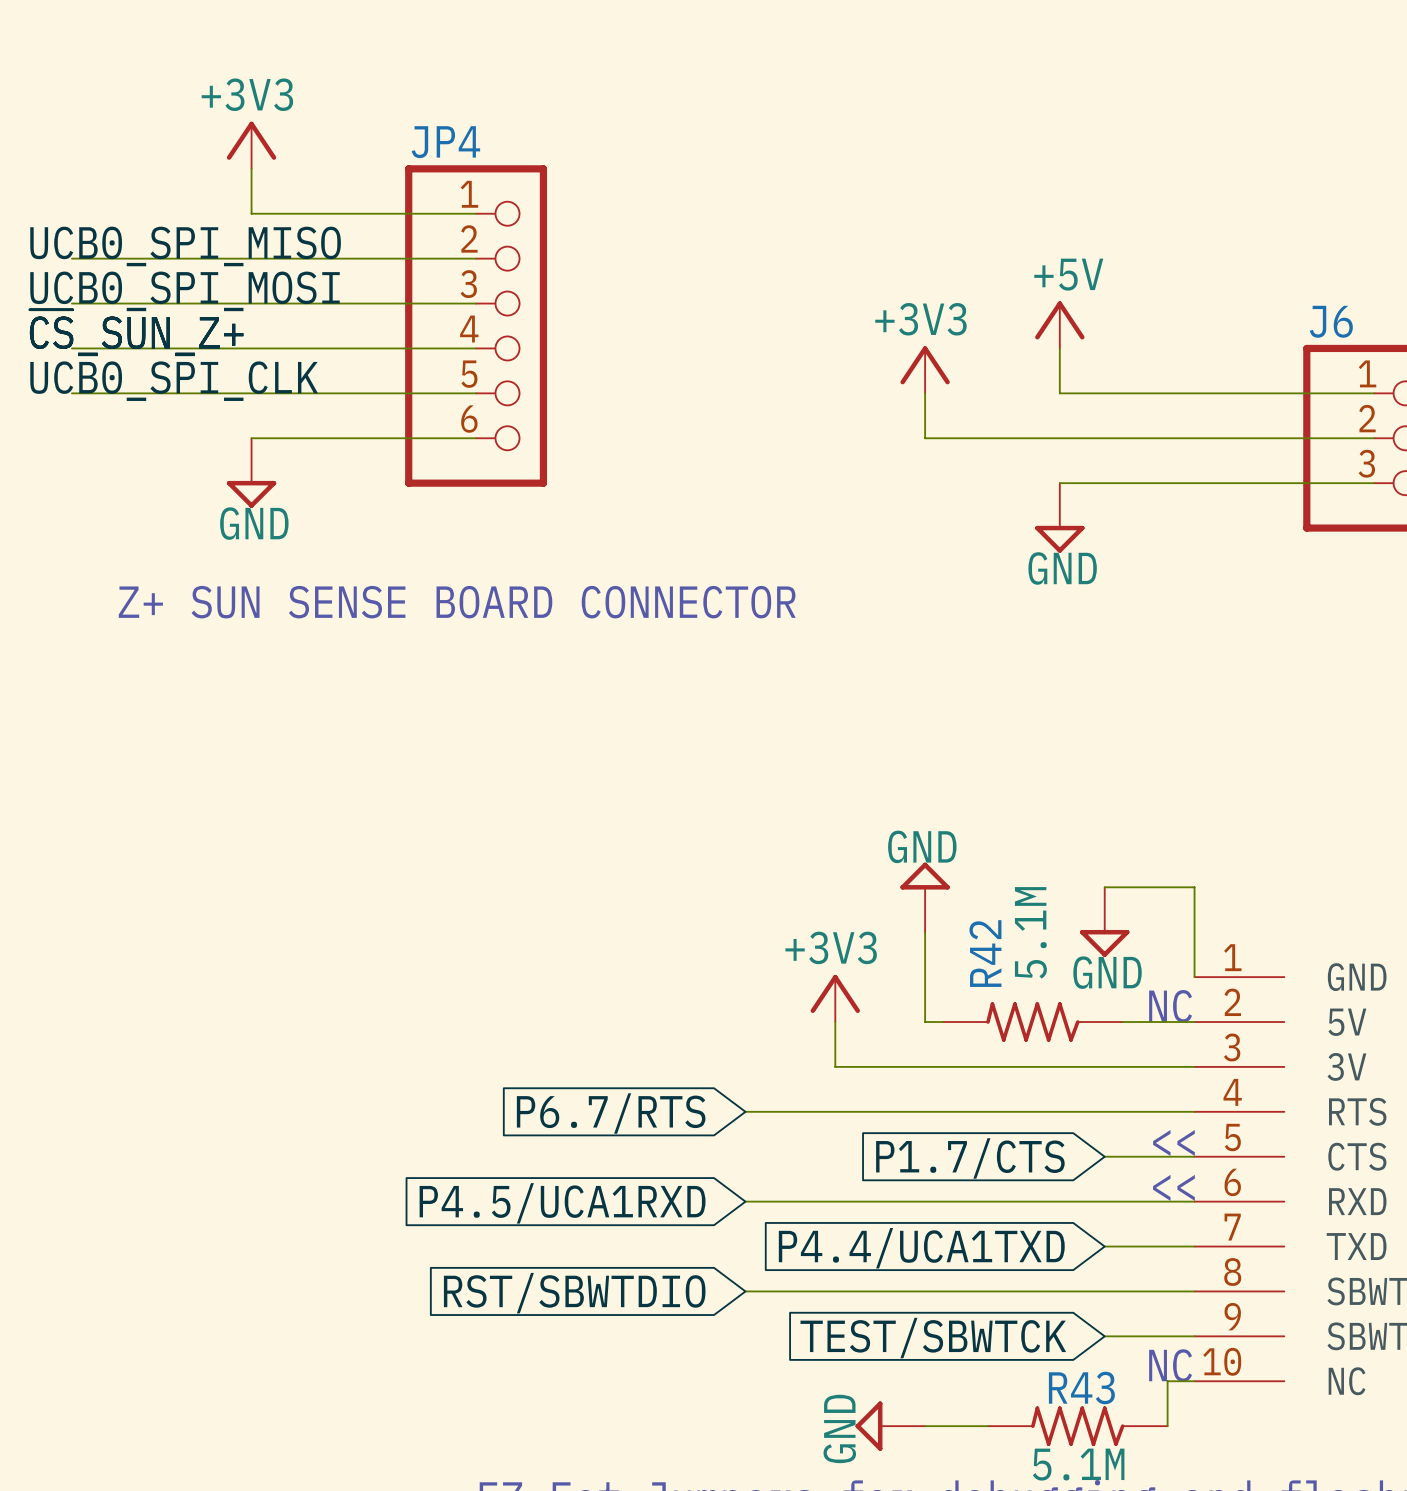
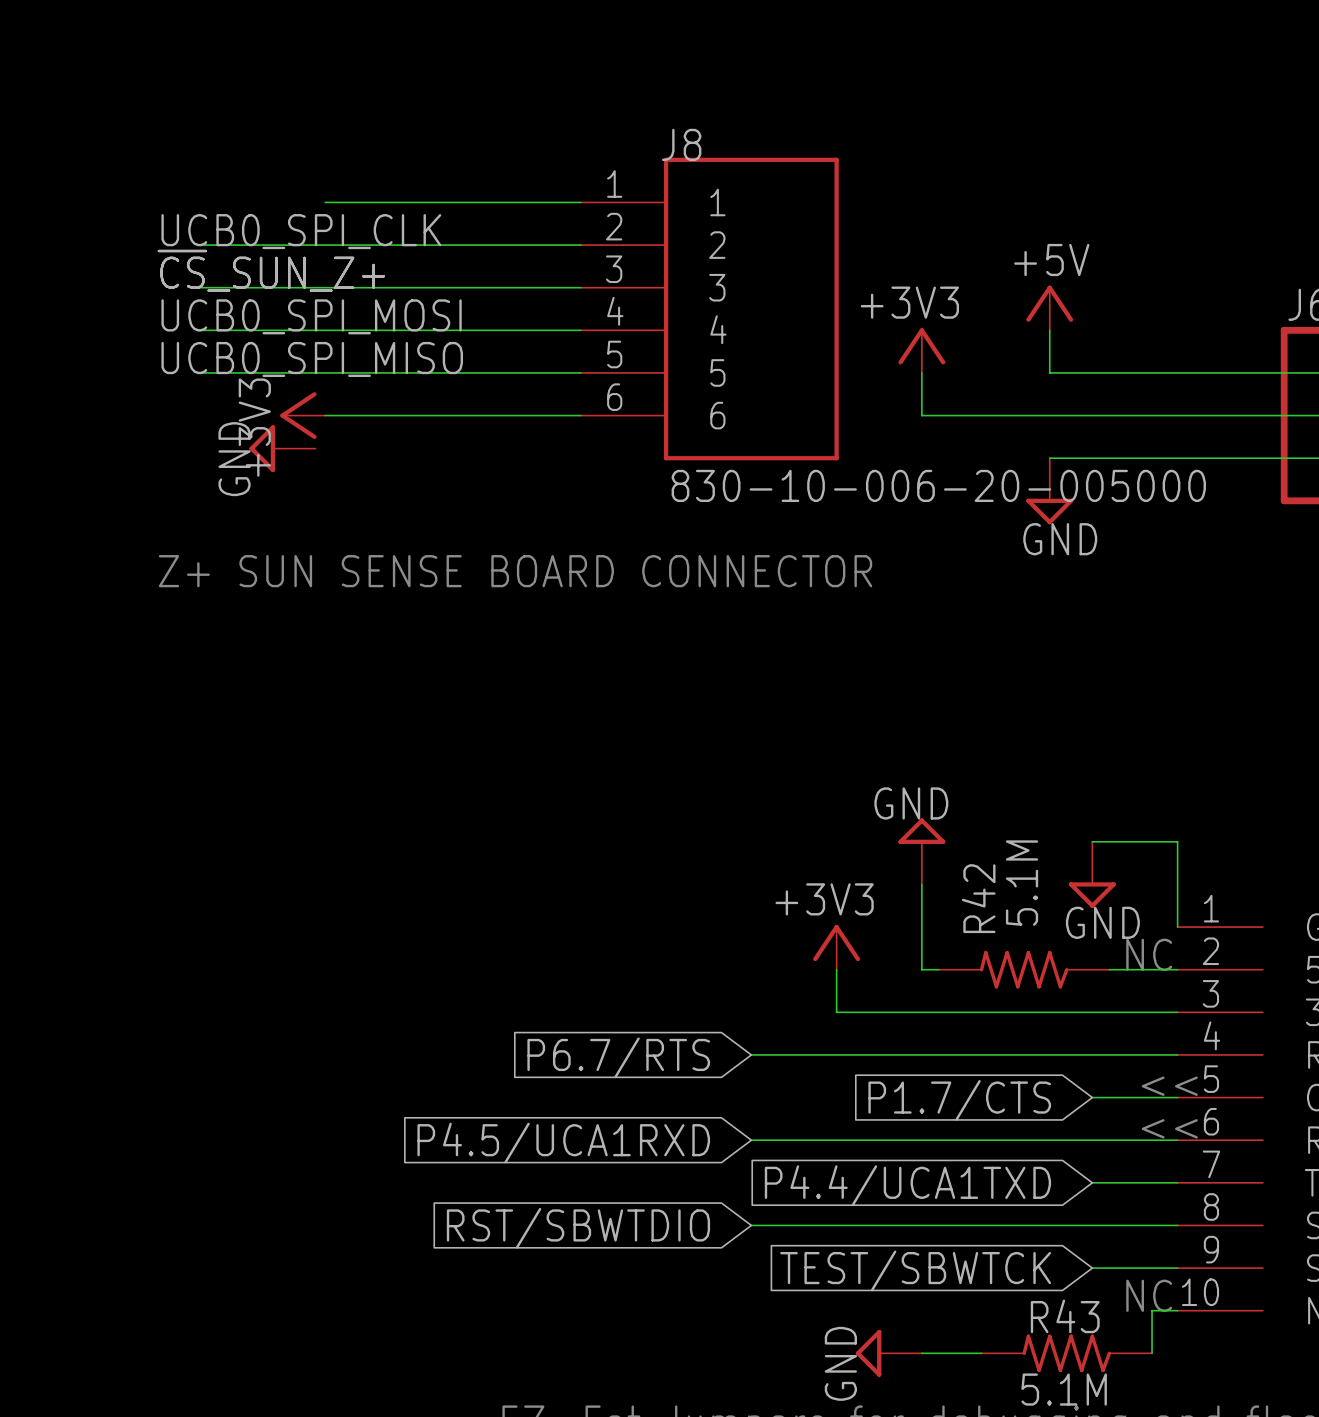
power symbol rotation: 0° (251, 140) -> 90° counterclockwise (298, 415)
power symbol position: +3V3 (251, 145) -> +3V3 (302, 415)
wire: (251, 168) (251, 213) (296, 213) -> none
wire: none -> (495, 202) (580, 202)
label position: UCB0_SPI_MISO (185, 246) -> UCB0_SPI_MISO (312, 359)
wire: (71, 258) (161, 258) -> (495, 245) (580, 245)
label position: UCB0_SPI_MOSI (185, 291) -> UCB0_SPI_MOSI (311, 316)
wire: (71, 303) (161, 303) -> (495, 287) (580, 287)
JP4: (476, 326) -> none
J8: none -> 830-10-006-20-005000 (709, 309)
label position: ~{CS}_SUN_Z+ (136, 332) -> ~{CS}_SUN_Z+ (271, 270)
wire: (71, 348) (161, 348) -> (495, 330) (580, 330)
label position: UCB0_SPI_CLK (174, 381) -> UCB0_SPI_CLK (301, 231)
wire: (71, 393) (161, 393) -> (495, 372) (580, 372)
wire: none -> (495, 415) (580, 415)
power symbol rotation: 0° (251, 494) -> 90° clockwise (262, 448)

